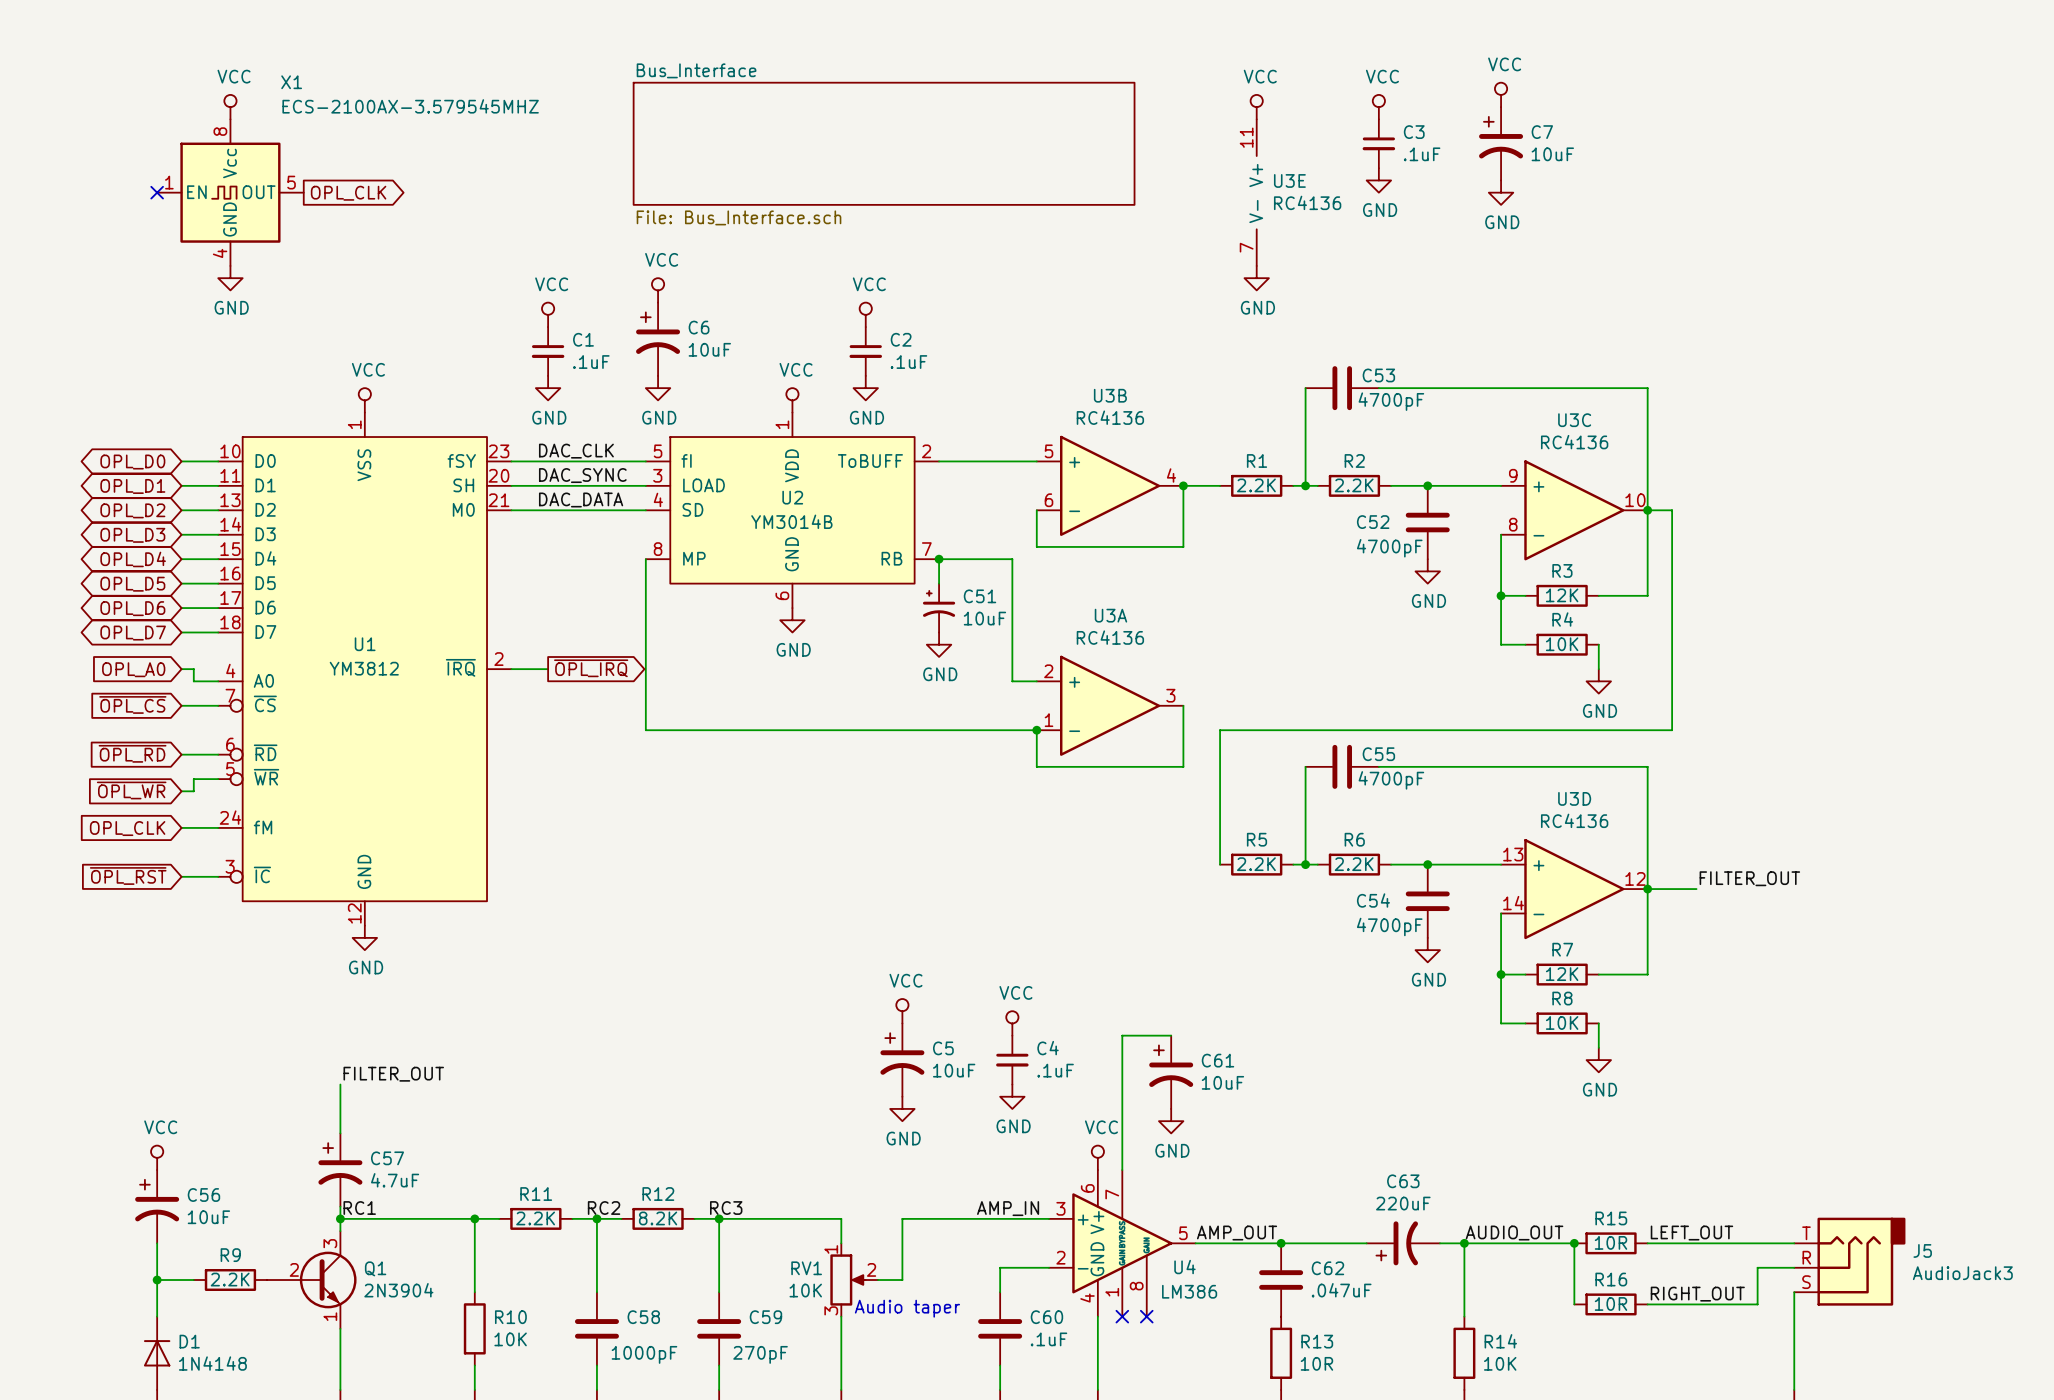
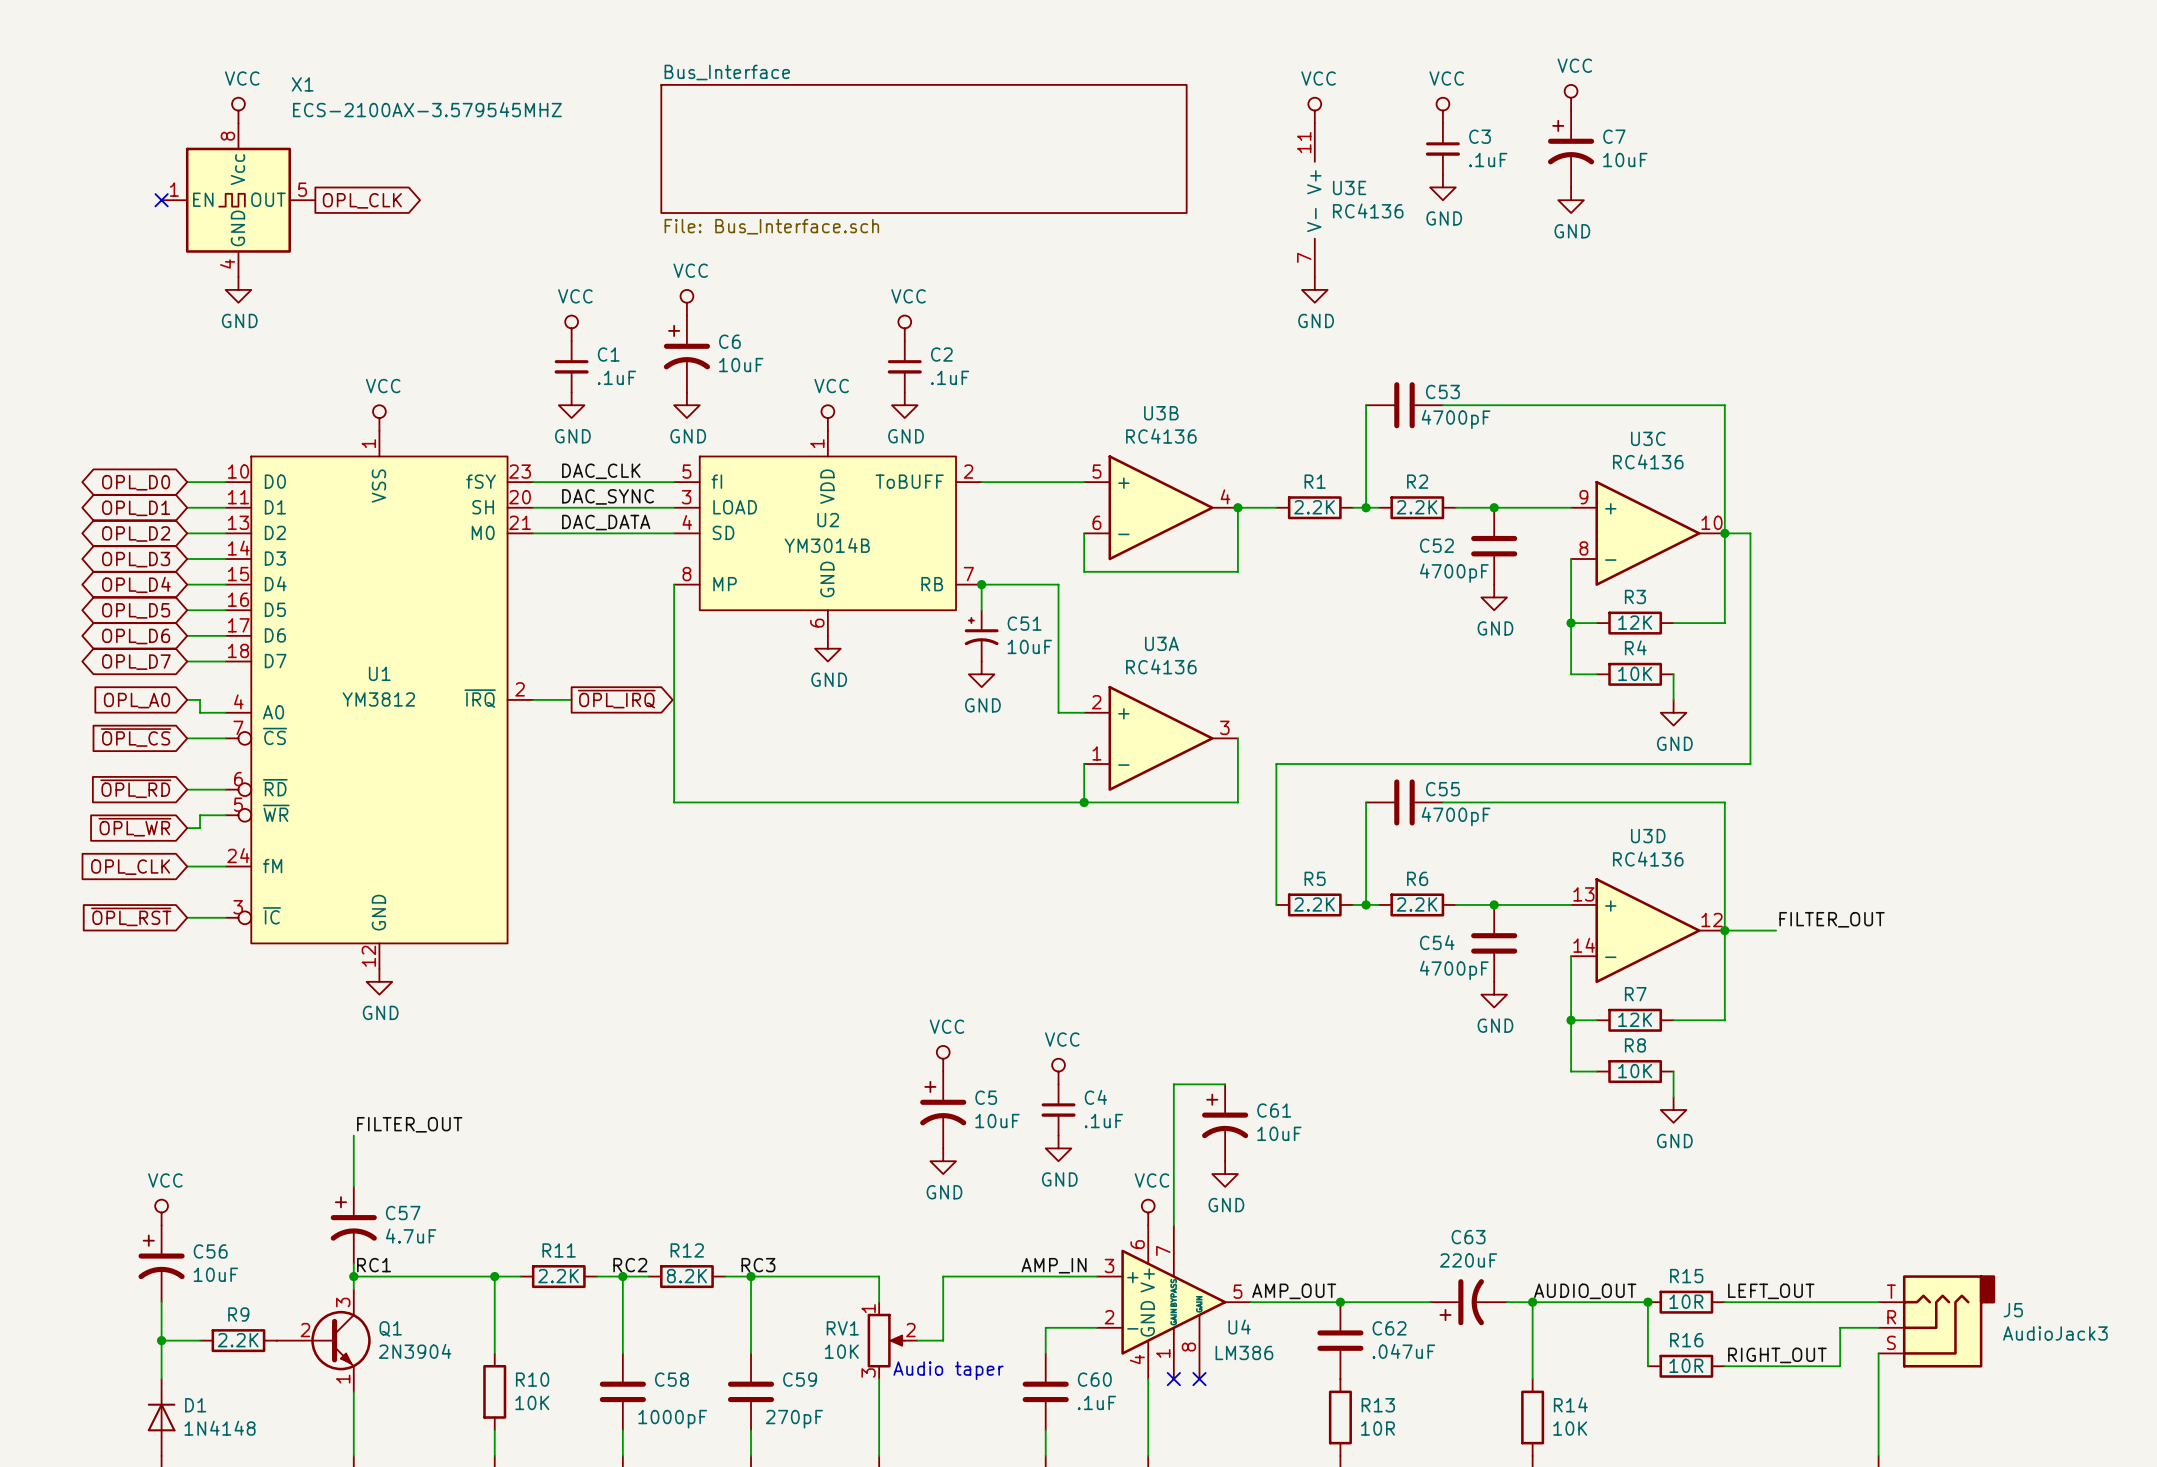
wire: (645, 730) (1036, 730) -> (674, 764) (674, 802) (1084, 802)
junction position: (1036, 730) -> (1084, 802)

